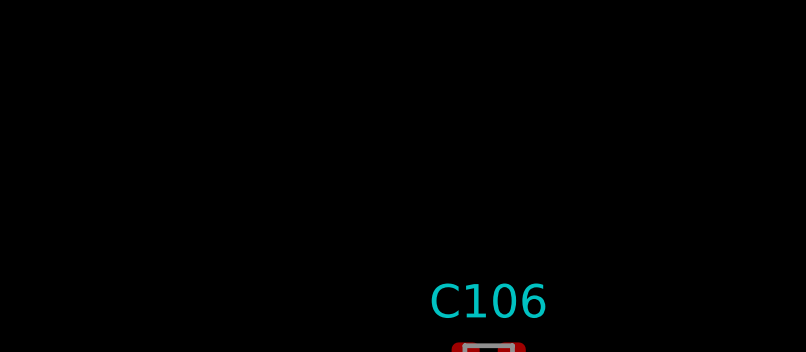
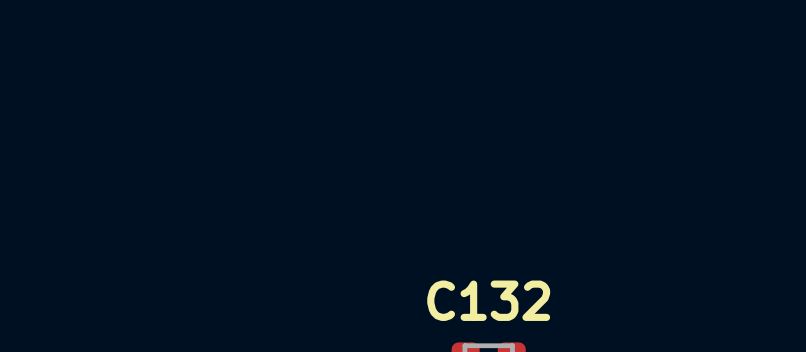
C106 name: C106 (488, 300) -> C132 (488, 300)

